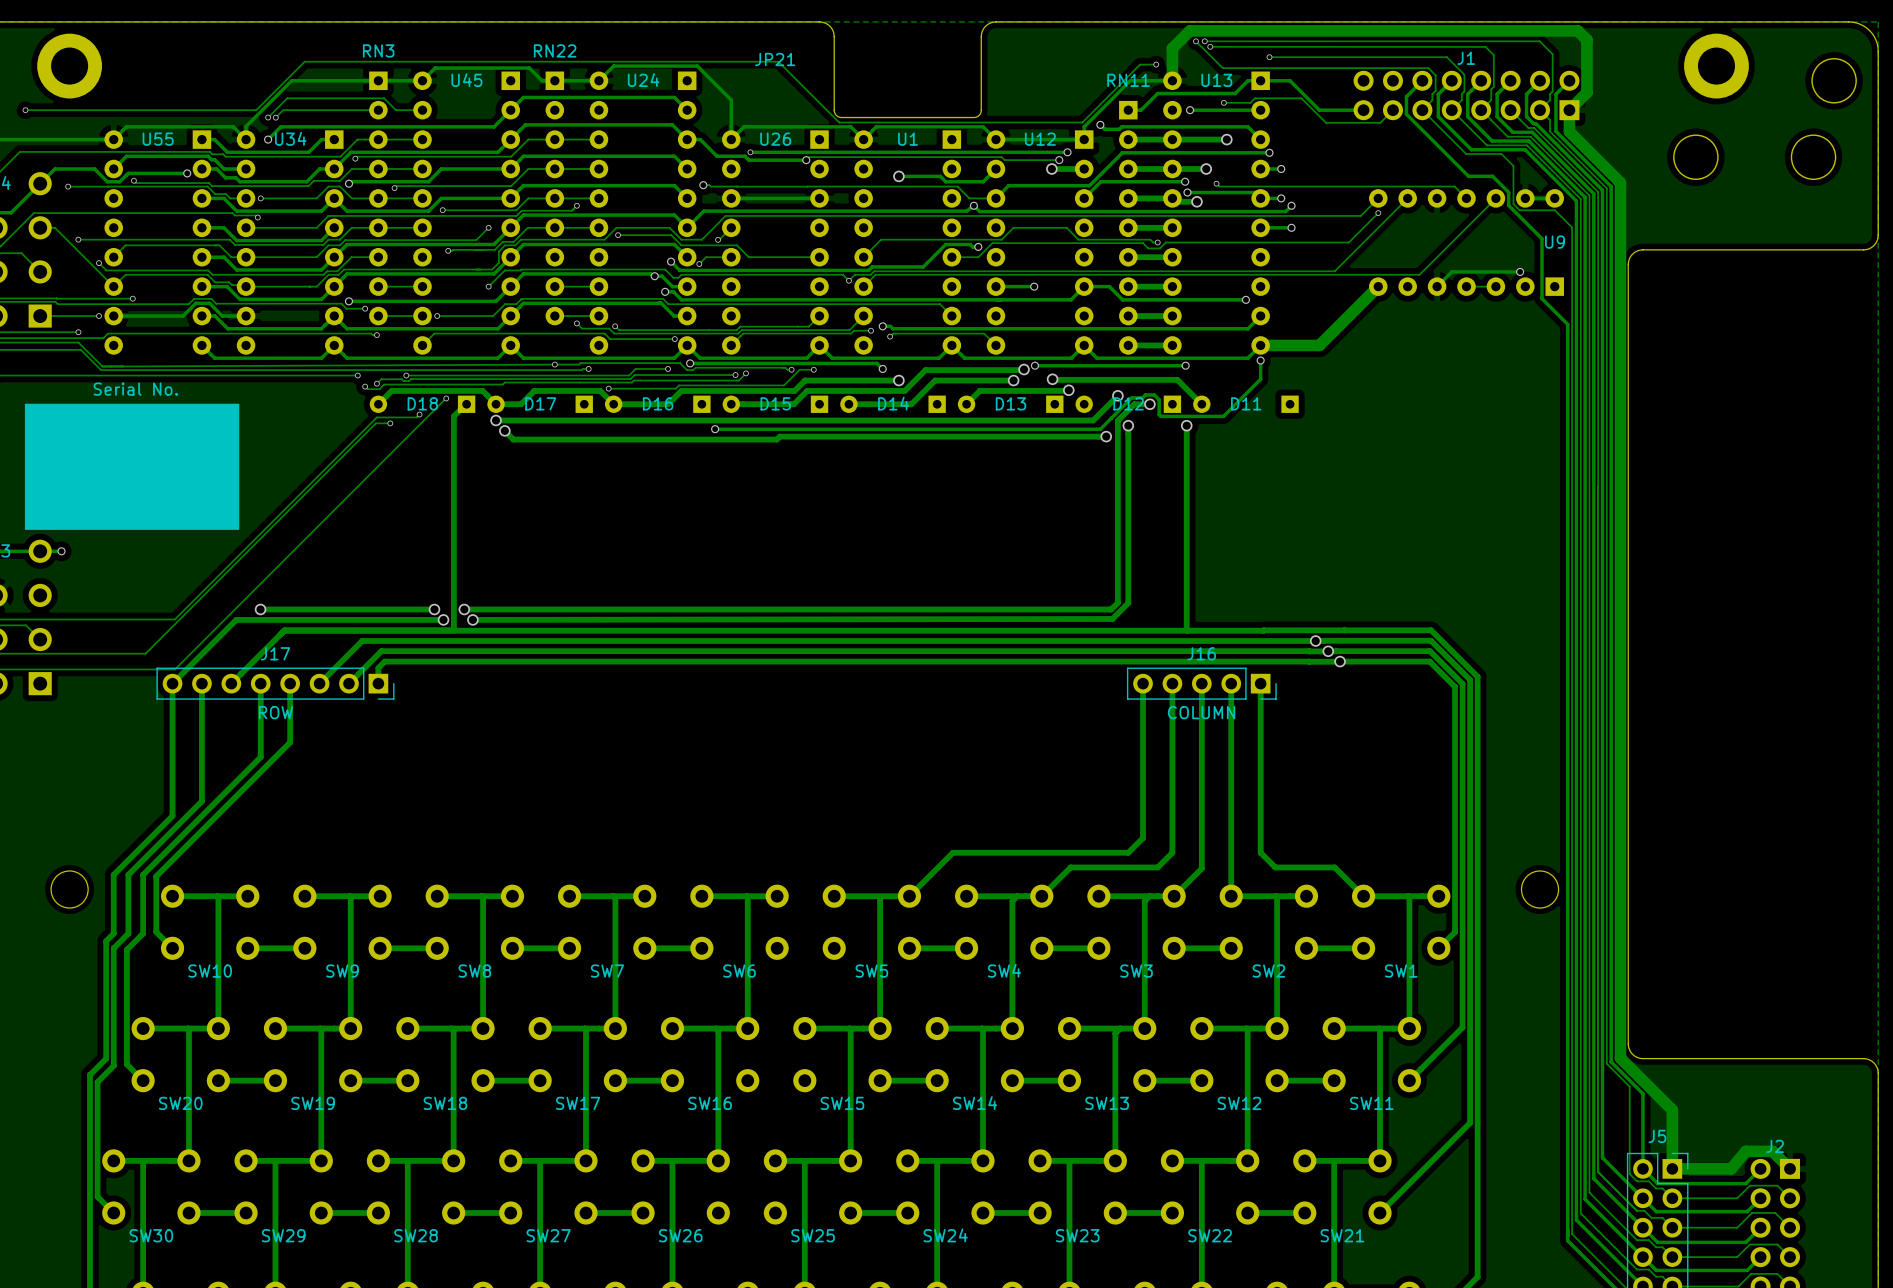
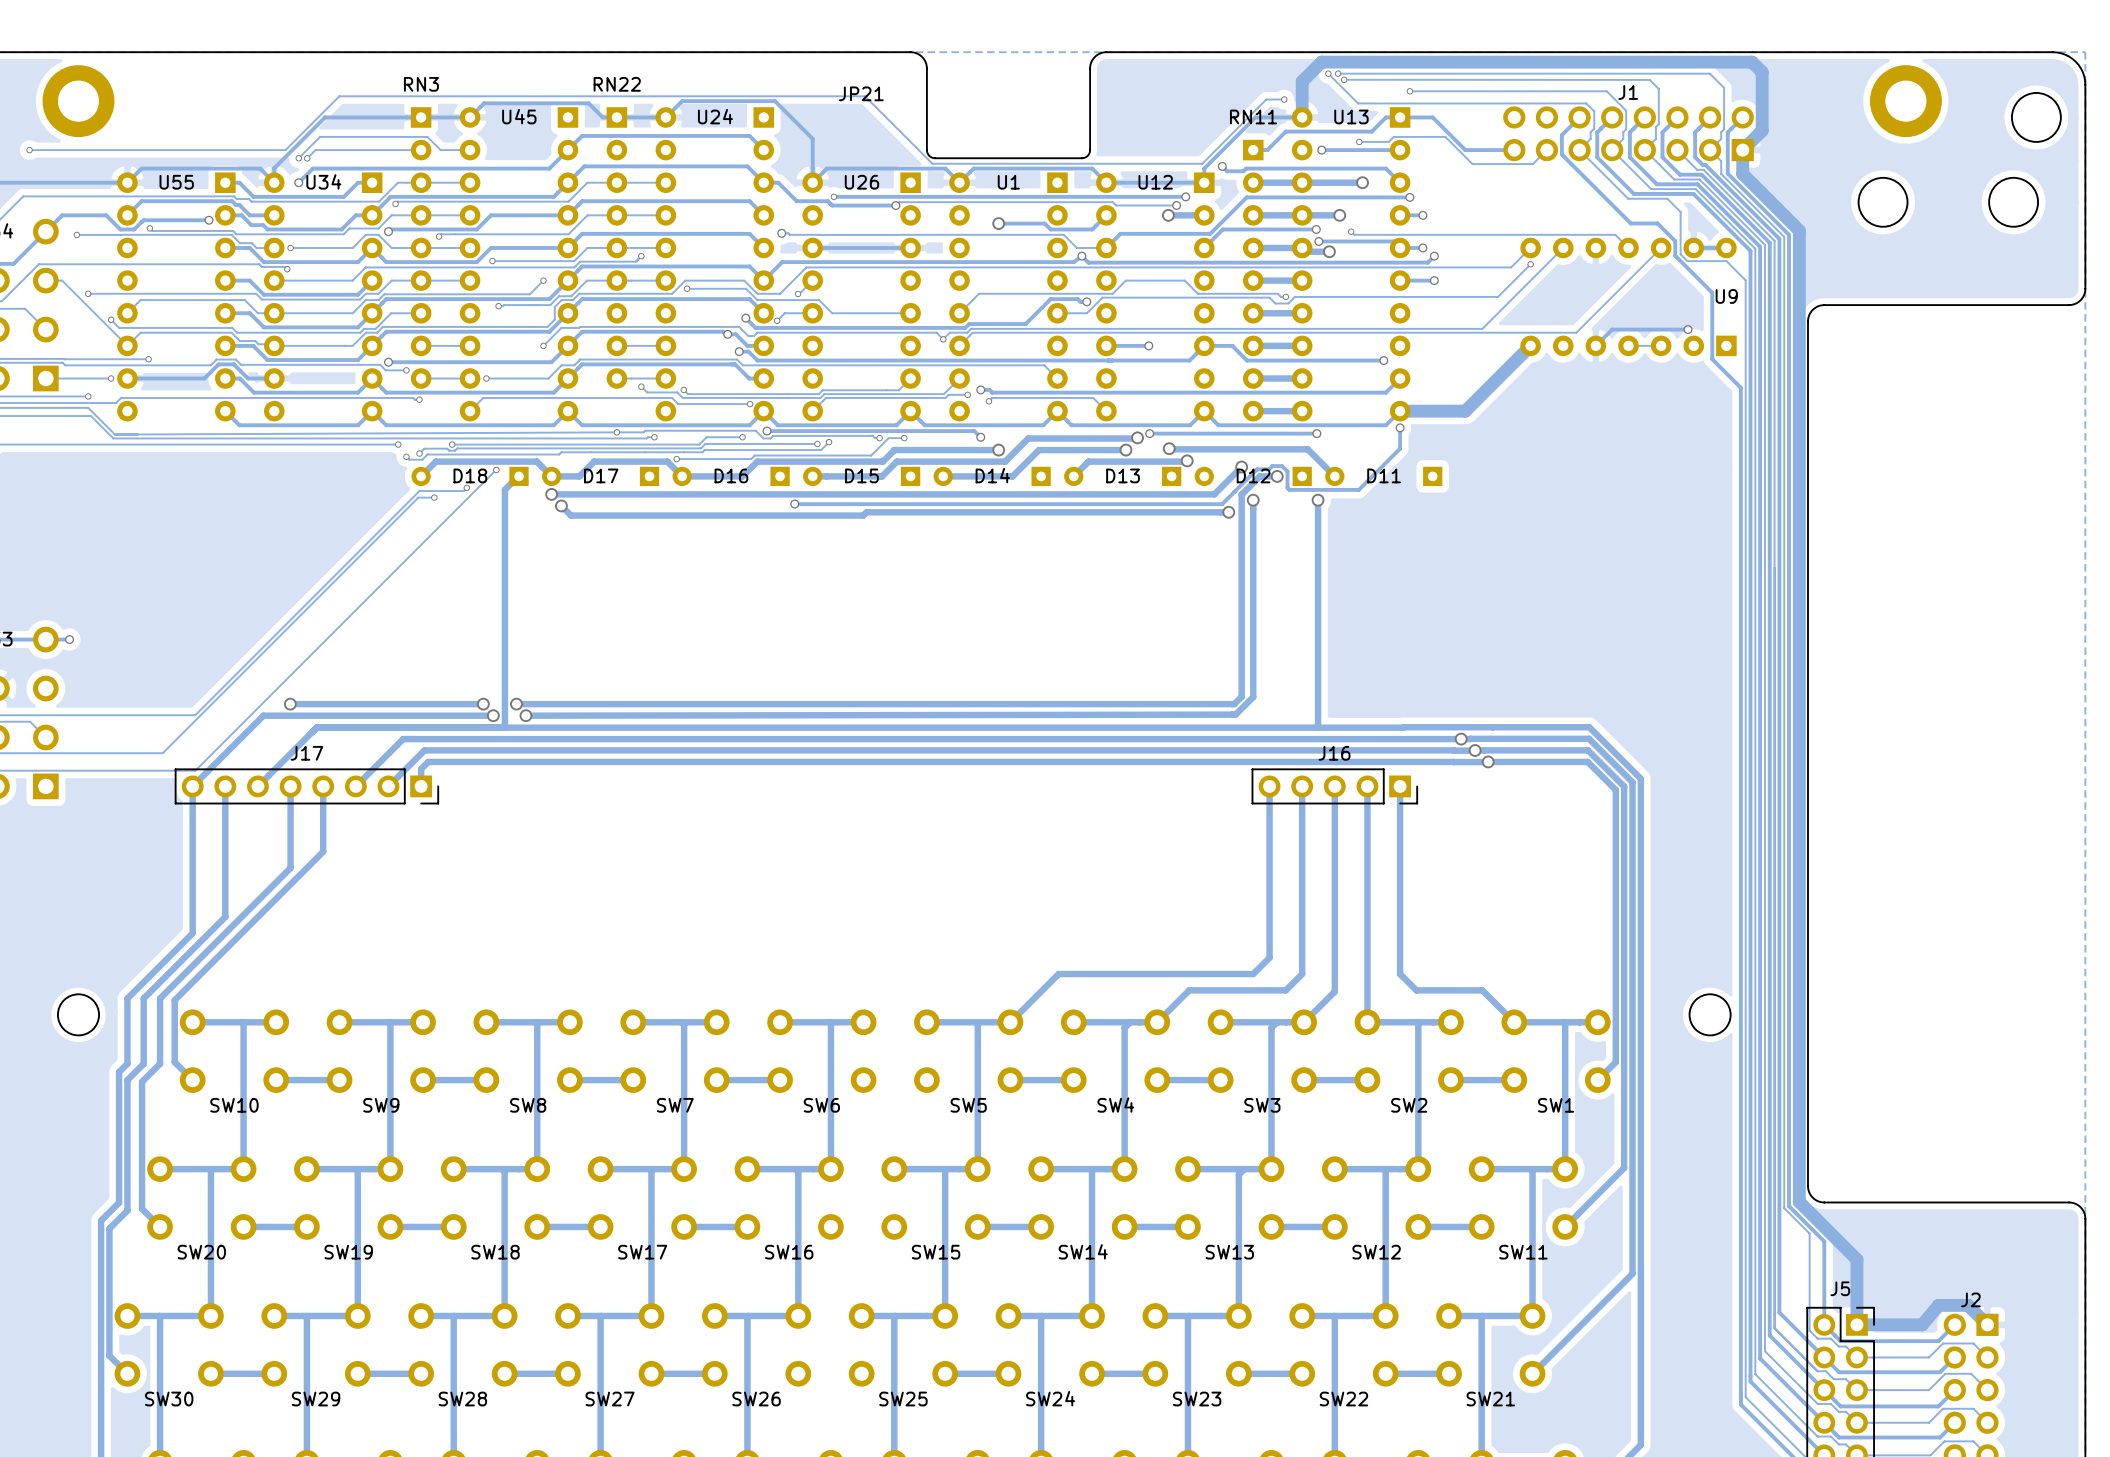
text: Serial No. (135, 389) -> none
drawing: [24, 403, 240, 530] -> none
J17 value: ROW (276, 712) -> none
J16 value: COLUMN (1201, 712) -> none

